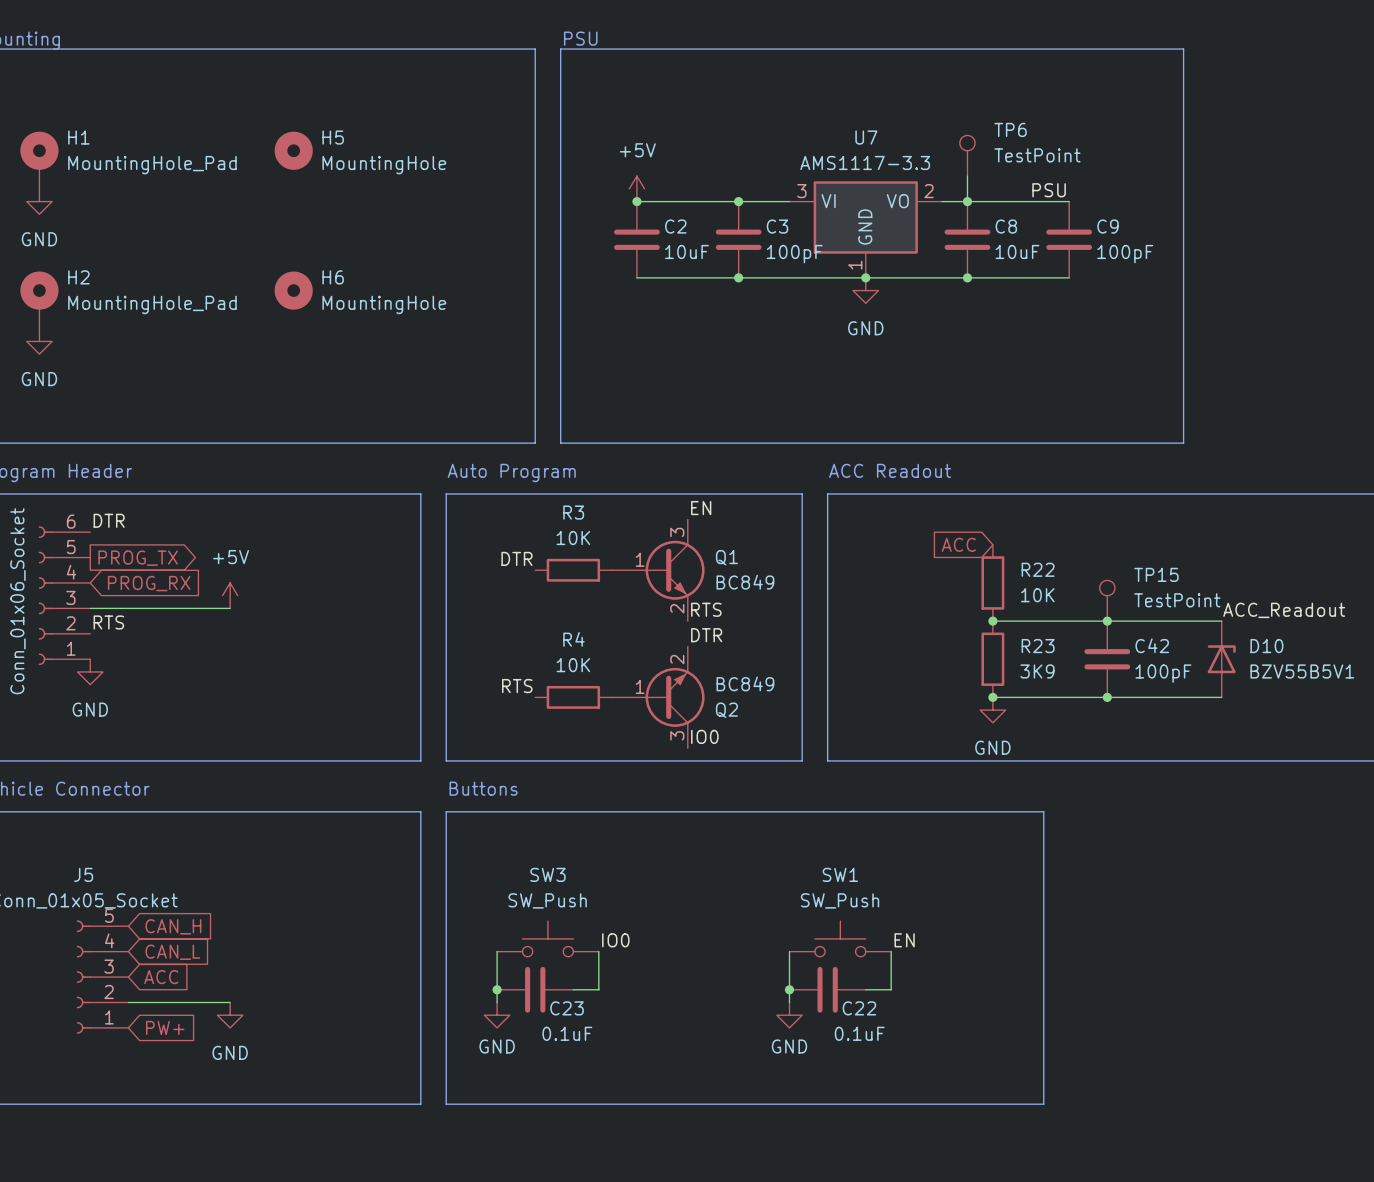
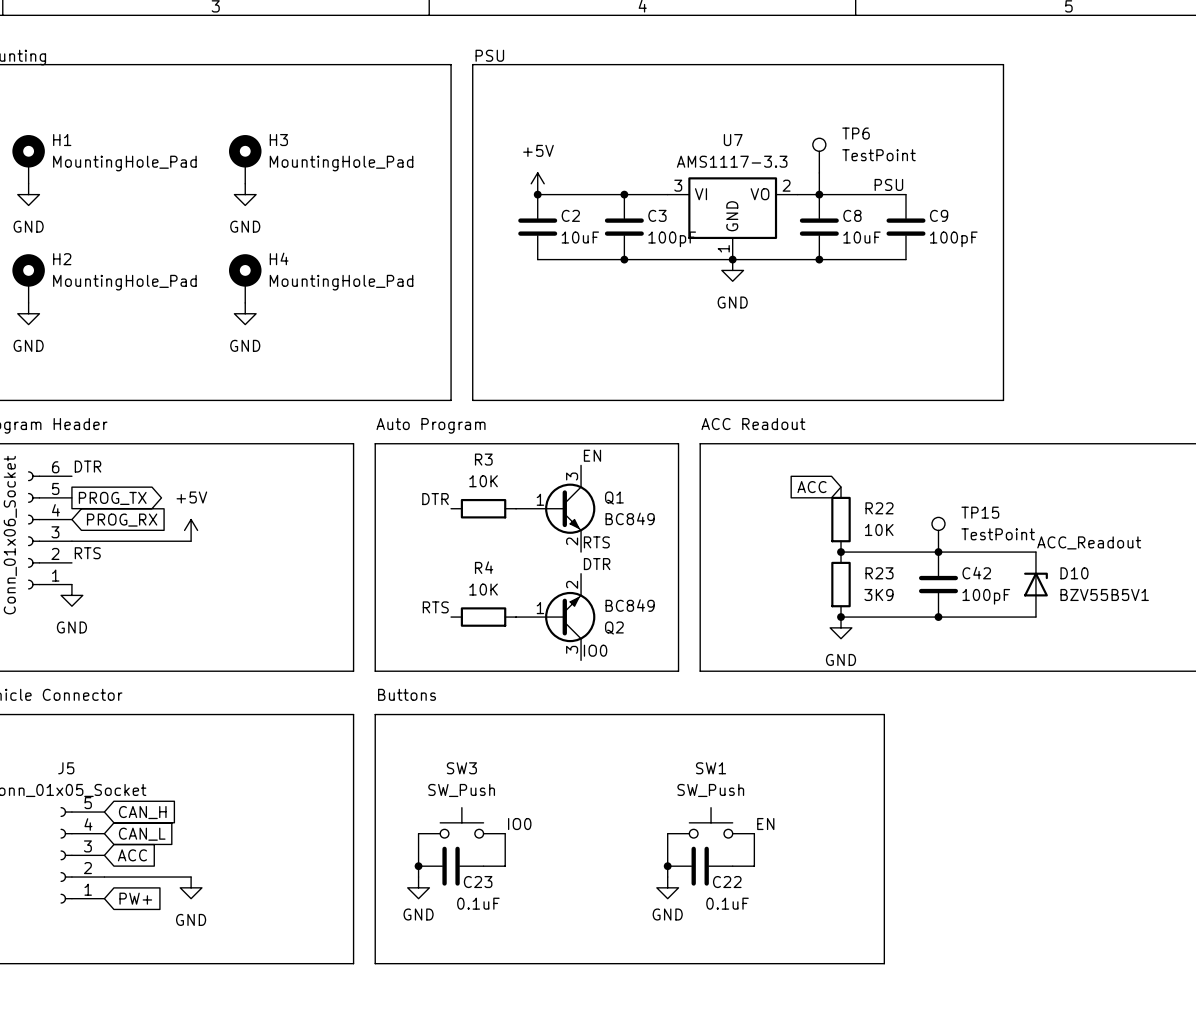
H5: MountingHole (293, 150) -> none
H3: none -> MountingHole_Pad (245, 159)
power symbol: none -> GND (245, 194)
H6: MountingHole (293, 290) -> none
H4: none -> MountingHole_Pad (245, 278)
power symbol: none -> GND (245, 313)

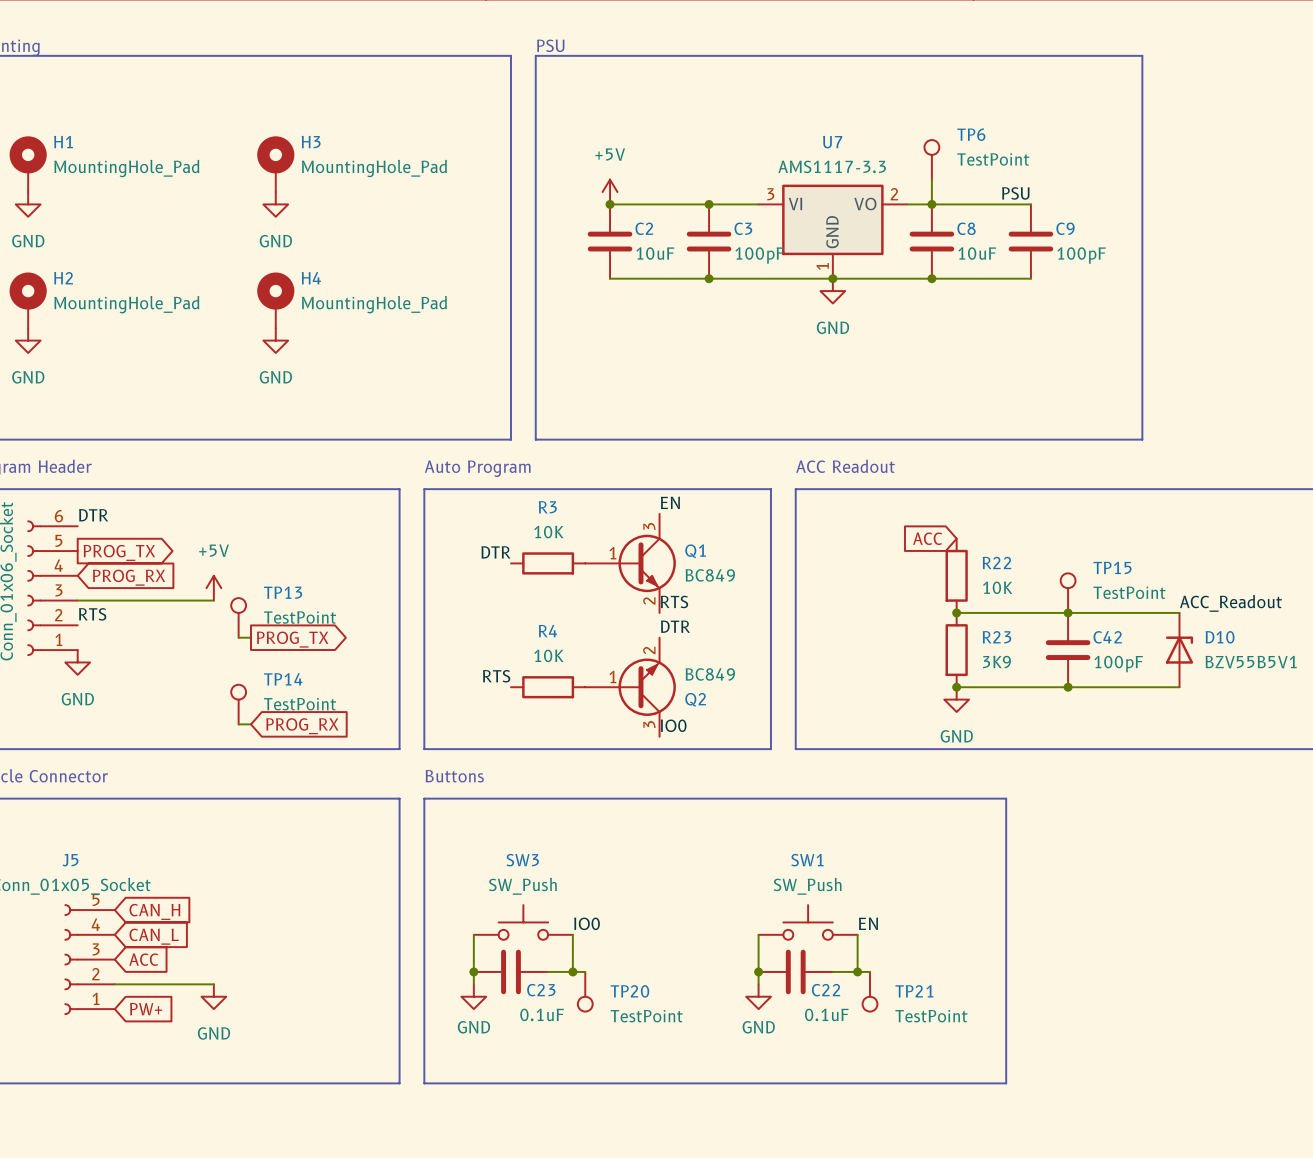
TP13: none -> TestPoint (238, 617)
wire: none -> (238, 637) (251, 637)
global label: none -> PROG_TX (292, 639)
TP14: none -> TestPoint (238, 704)
wire: none -> (238, 724) (251, 724)
global label: none -> PROG_RX (302, 726)
wire: none -> (572, 971) (585, 971)
junction: none -> (572, 971)
wire: none -> (857, 971) (870, 971)
junction: none -> (857, 971)
TP20: none -> TestPoint (585, 991)
TP21: none -> TestPoint (870, 991)

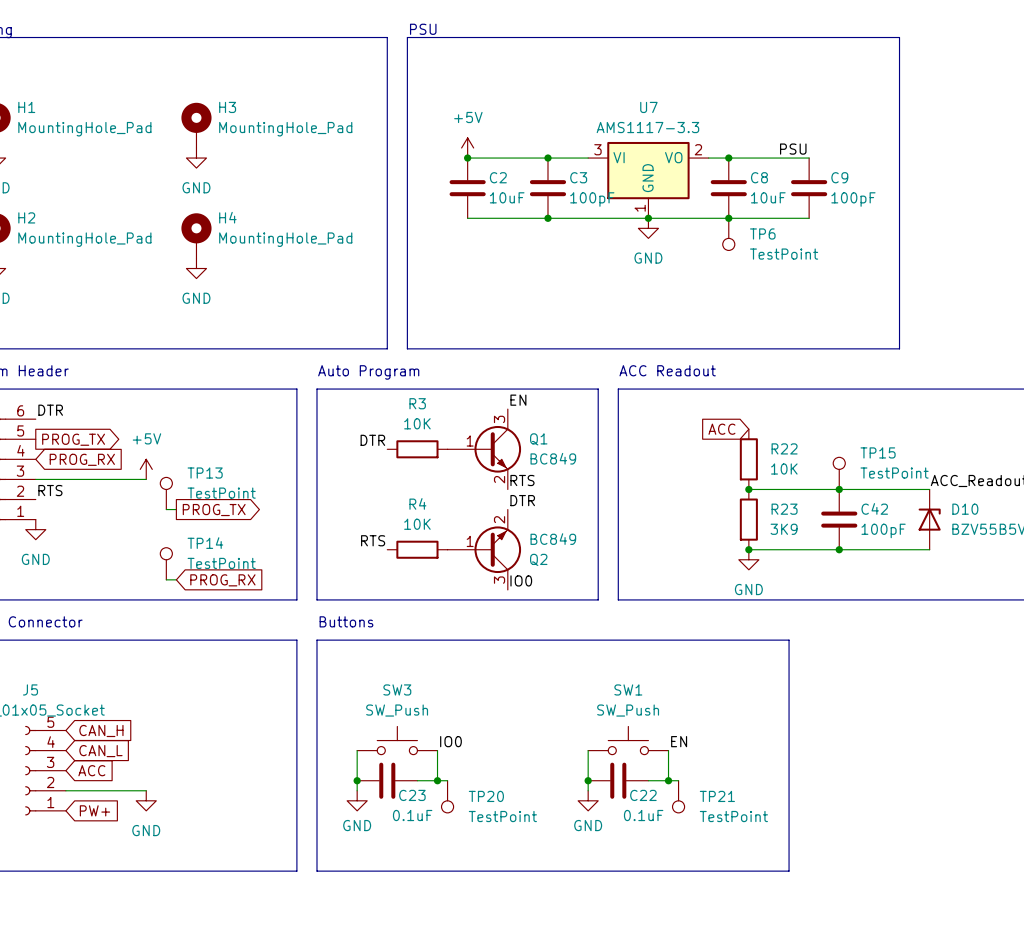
TP6 name position: TP6 (971, 134) -> TP6 (762, 233)
TP6 rotation: 0° (931, 147) -> 180° (728, 244)
TP6 position: (931, 159) -> (728, 234)
TP6 value position: TestPoint (993, 159) -> TestPoint (784, 254)
wire: (931, 179) (931, 204) -> none

